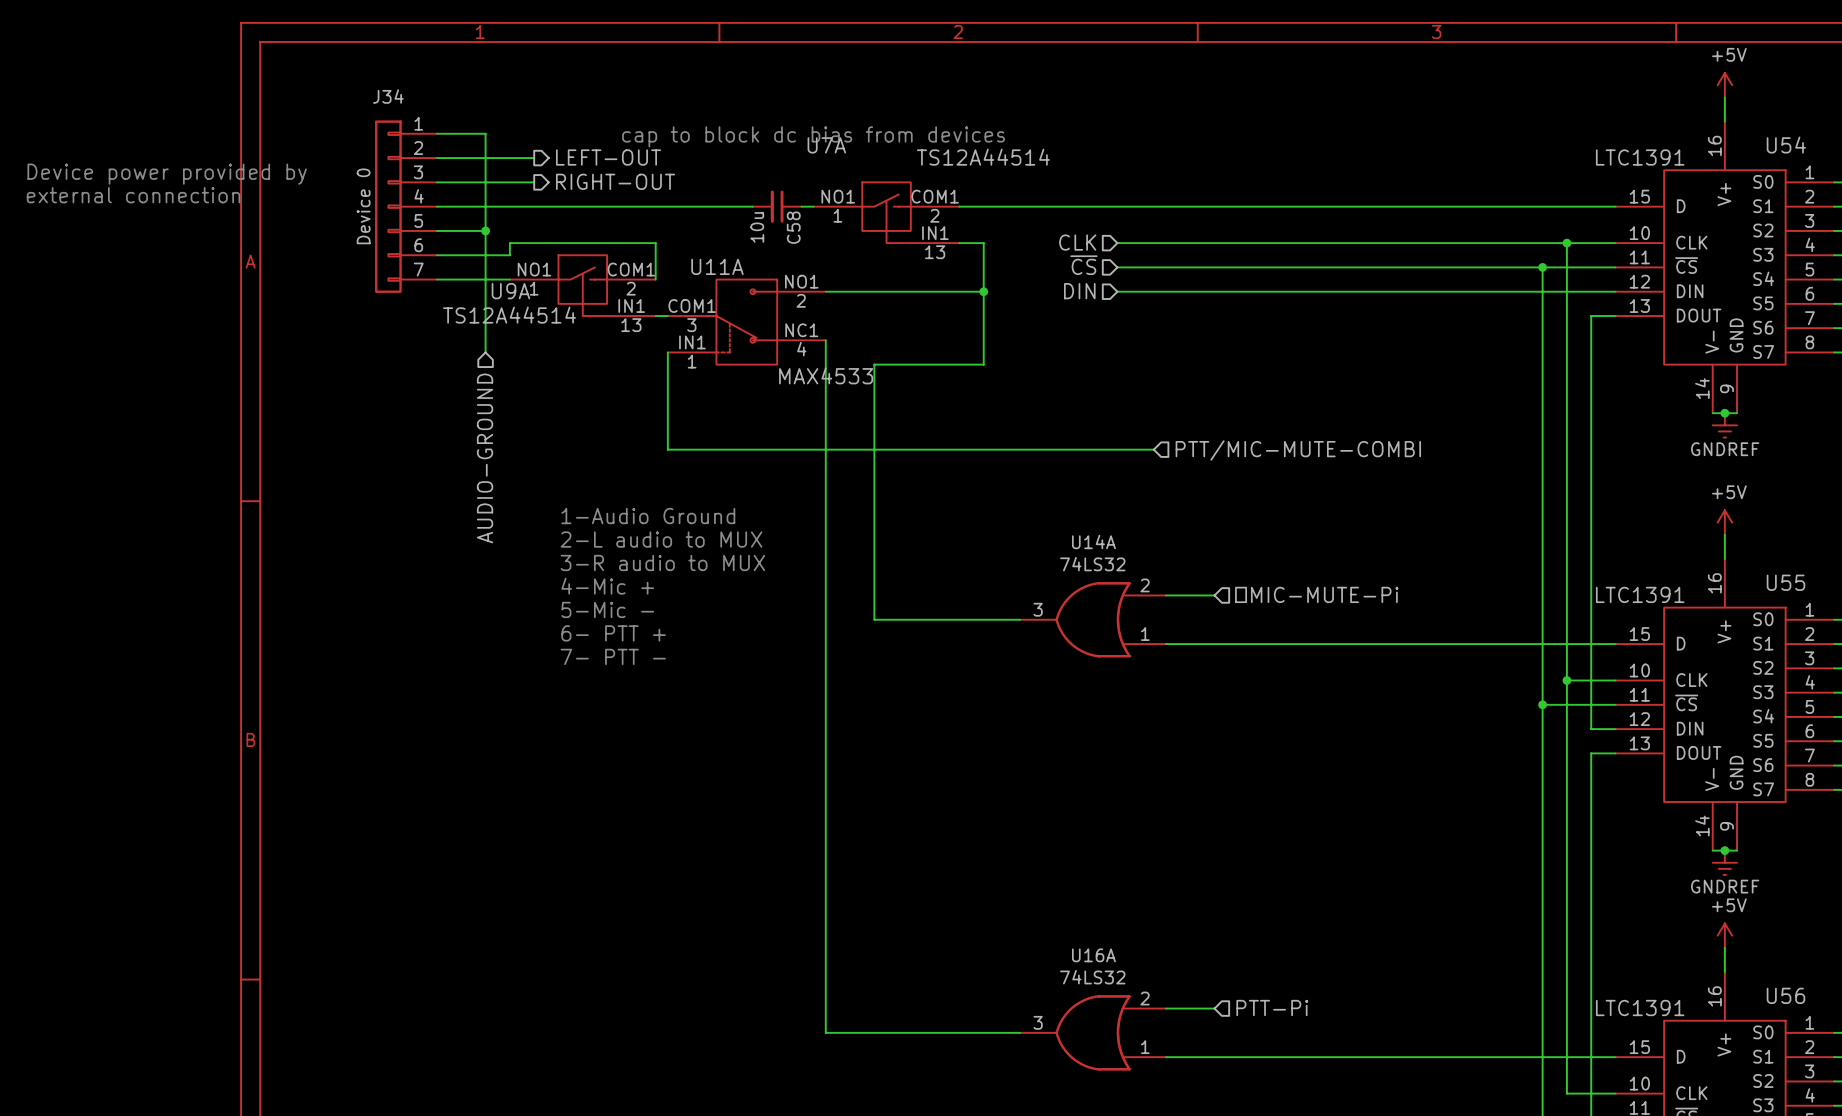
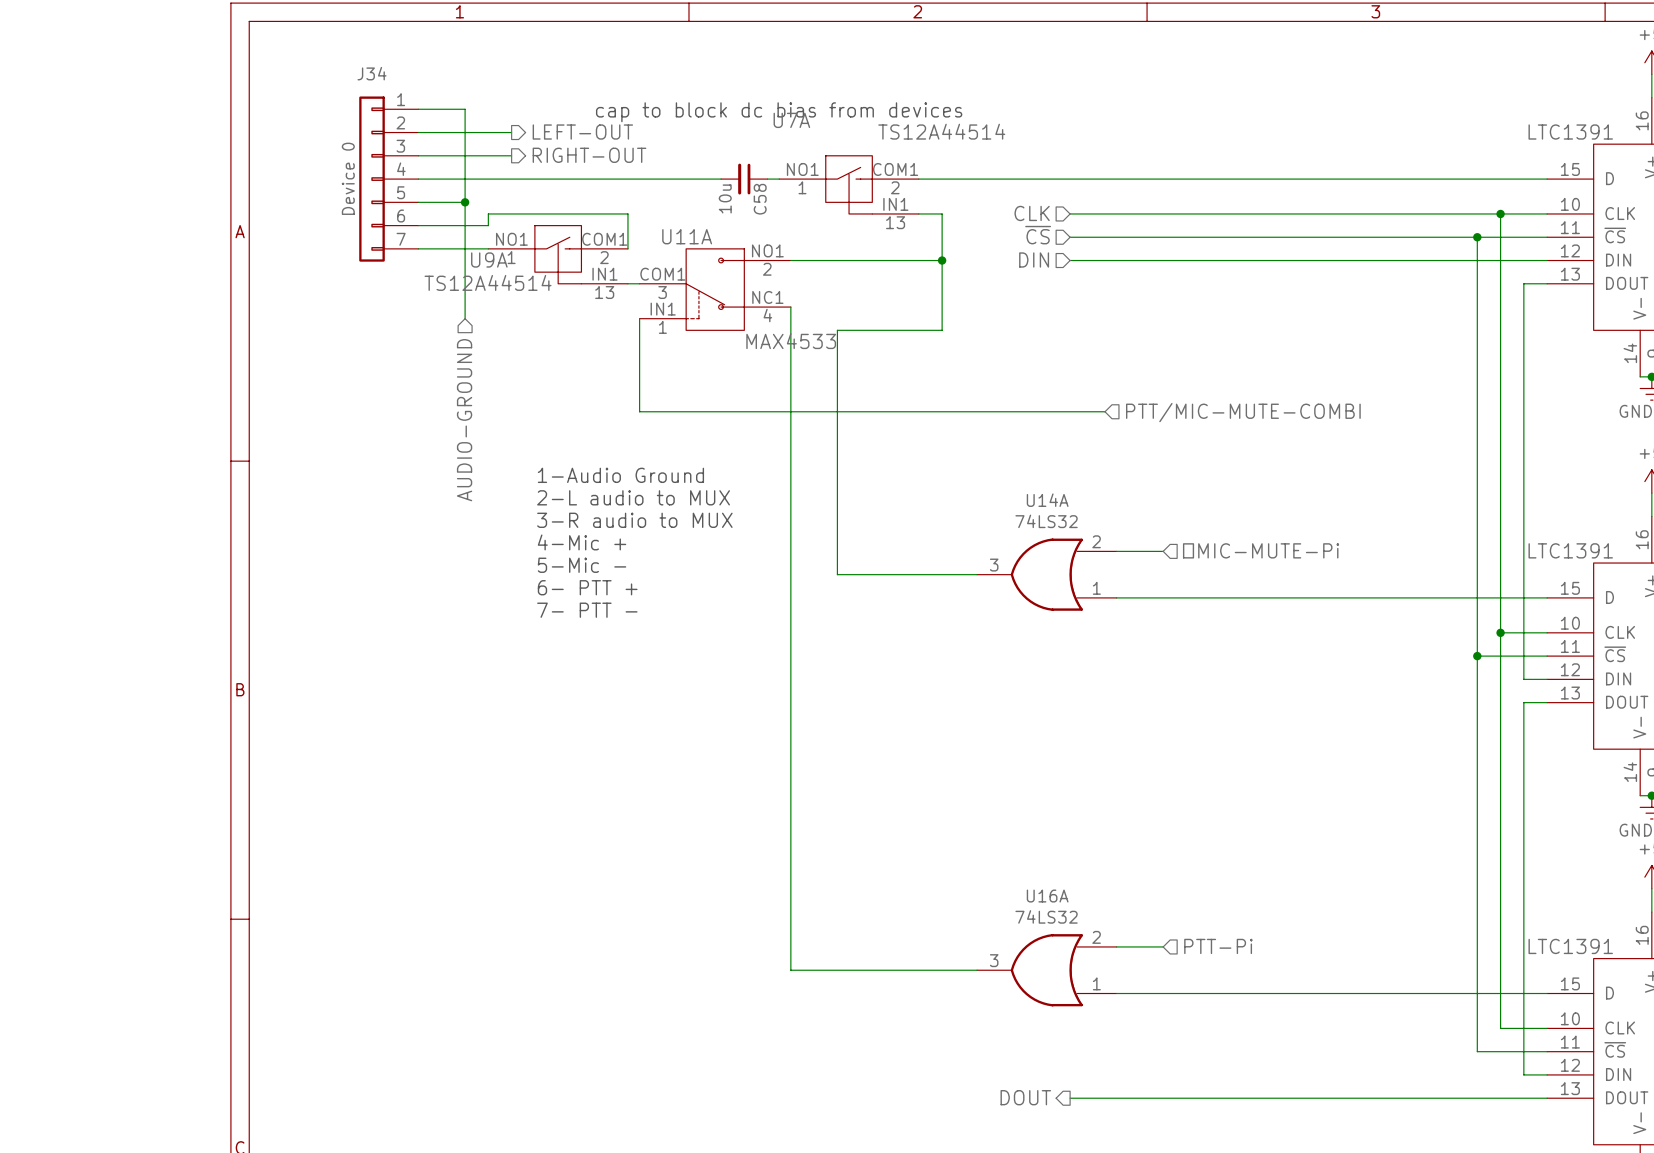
text: Device power provided by (167, 174) -> none
text: external connection (133, 195) -> none

